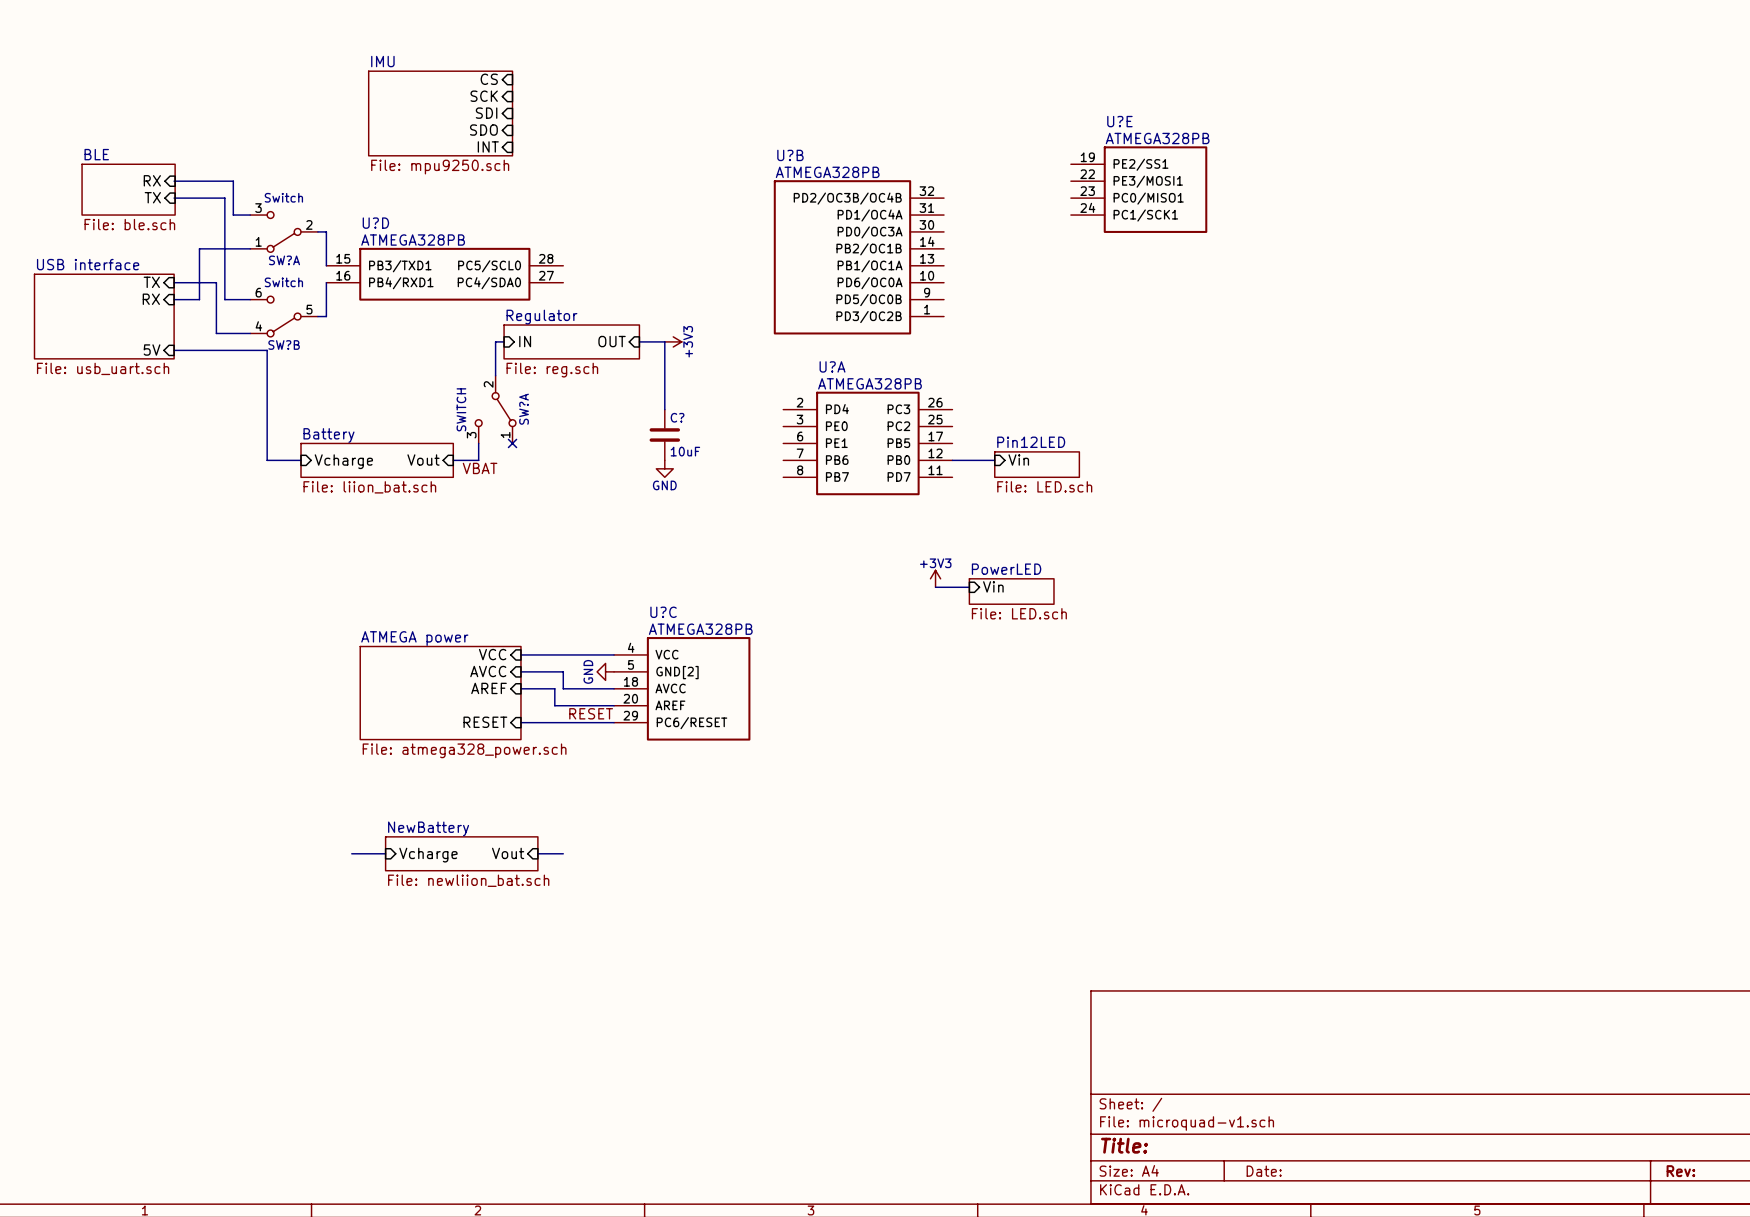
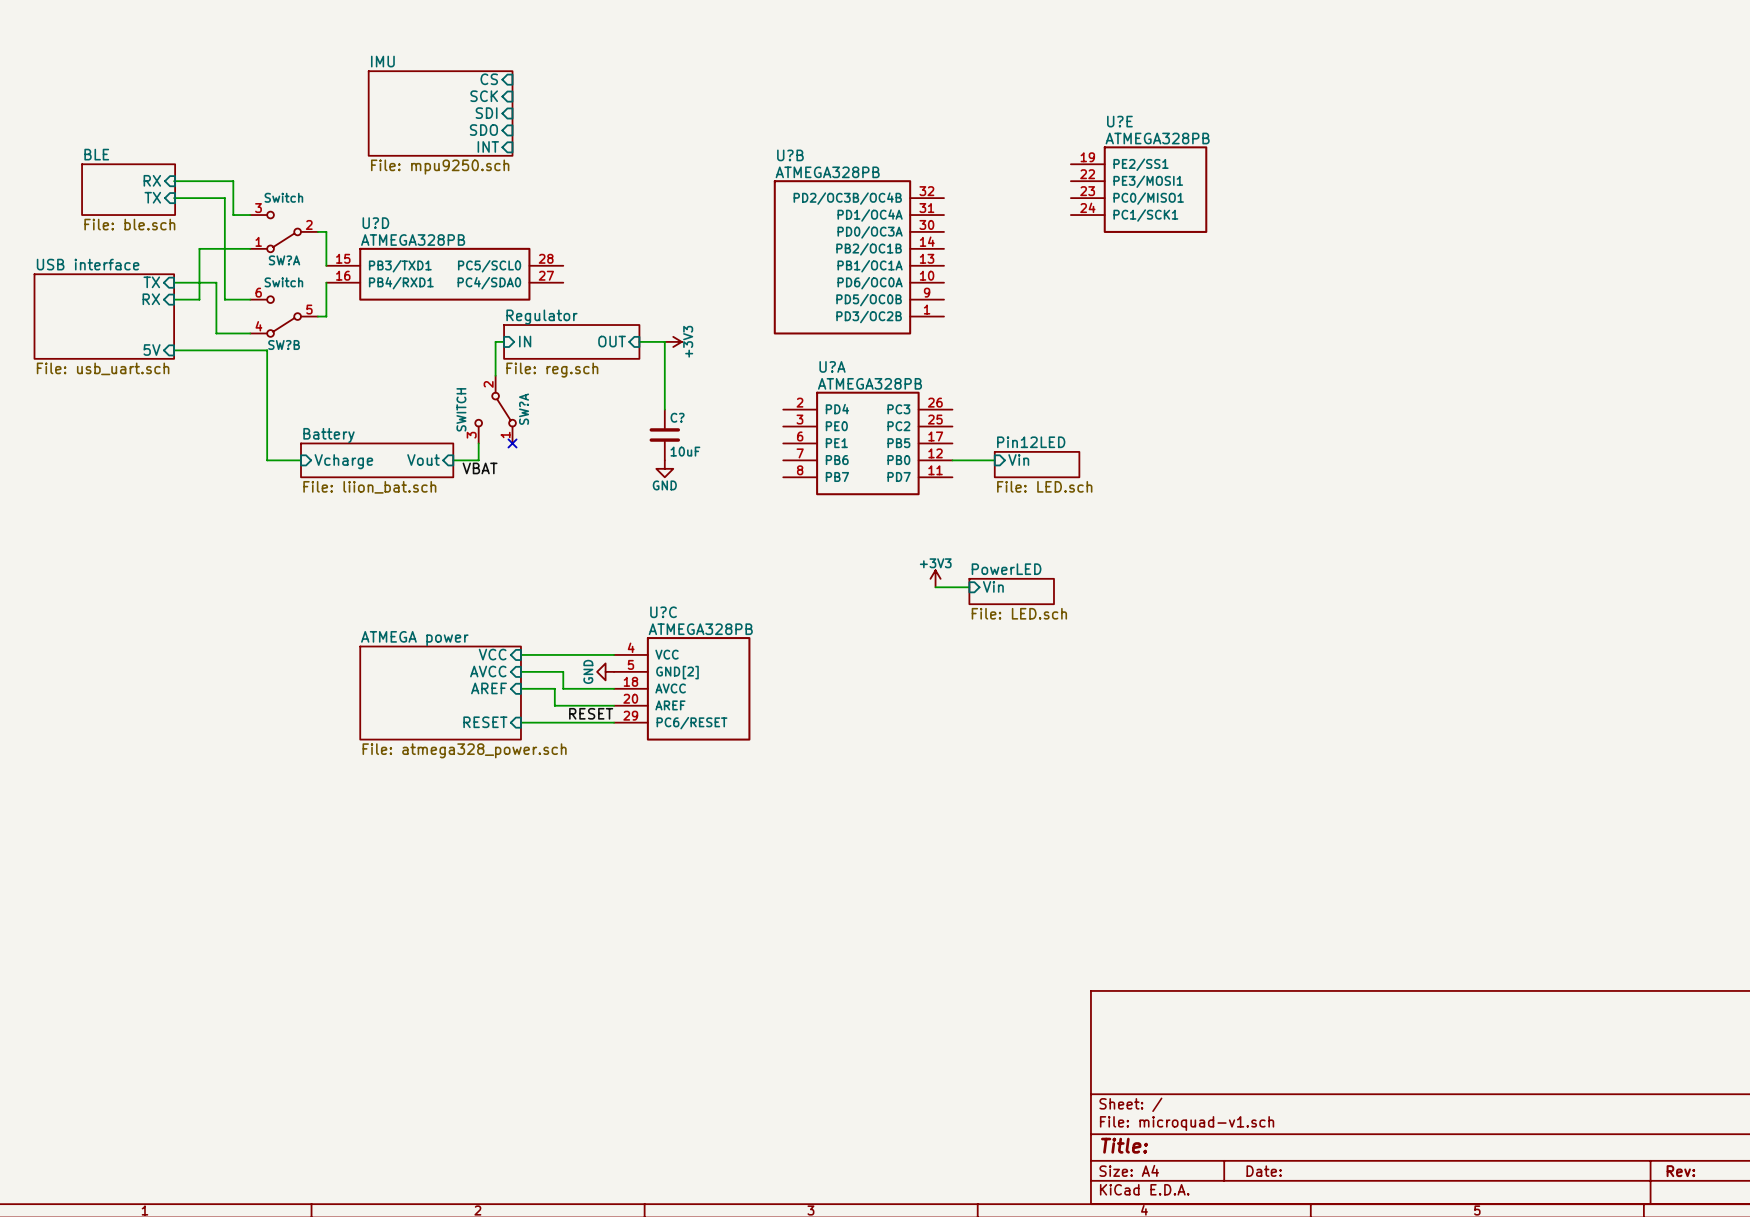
wire: (351, 853) (385, 853) -> none
sheet NewBattery: File: newliion_bat.sch (461, 853) -> none
sheet pin: Vout (508, 853) -> none
wire: (537, 853) (563, 853) -> none
sheet pin: Vcharge (428, 855) -> none

